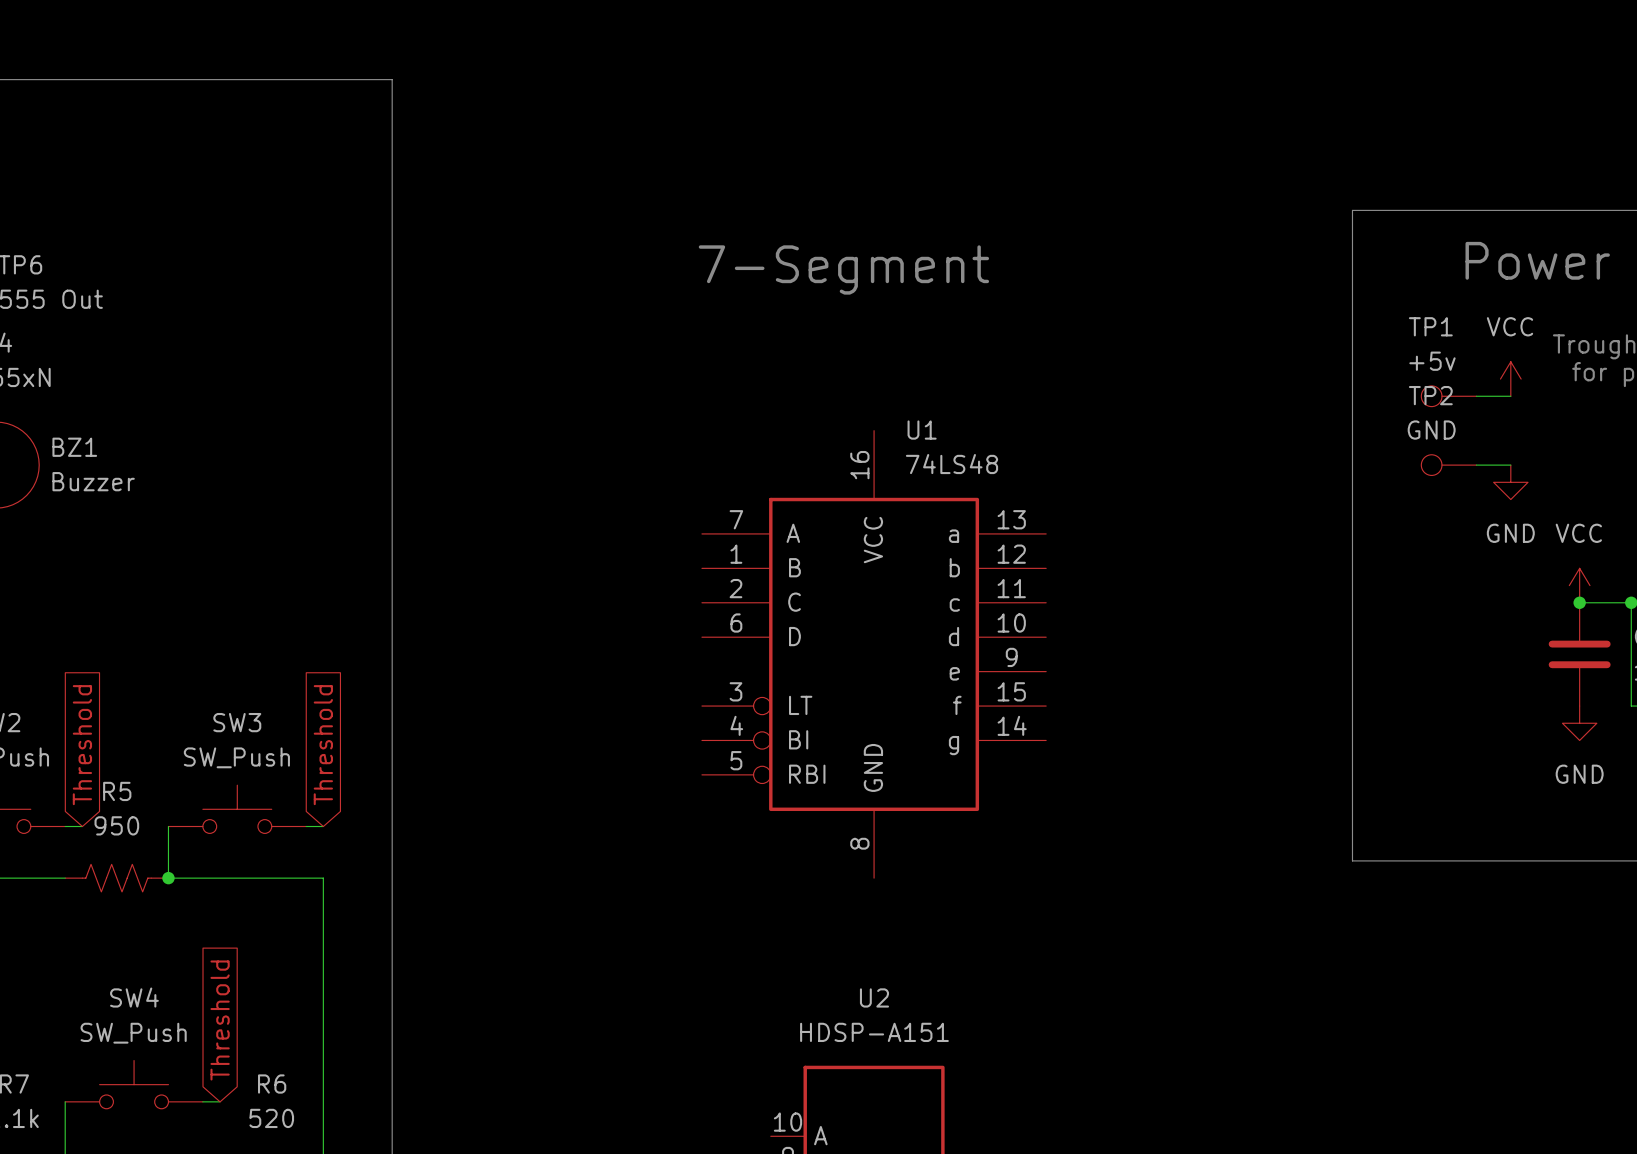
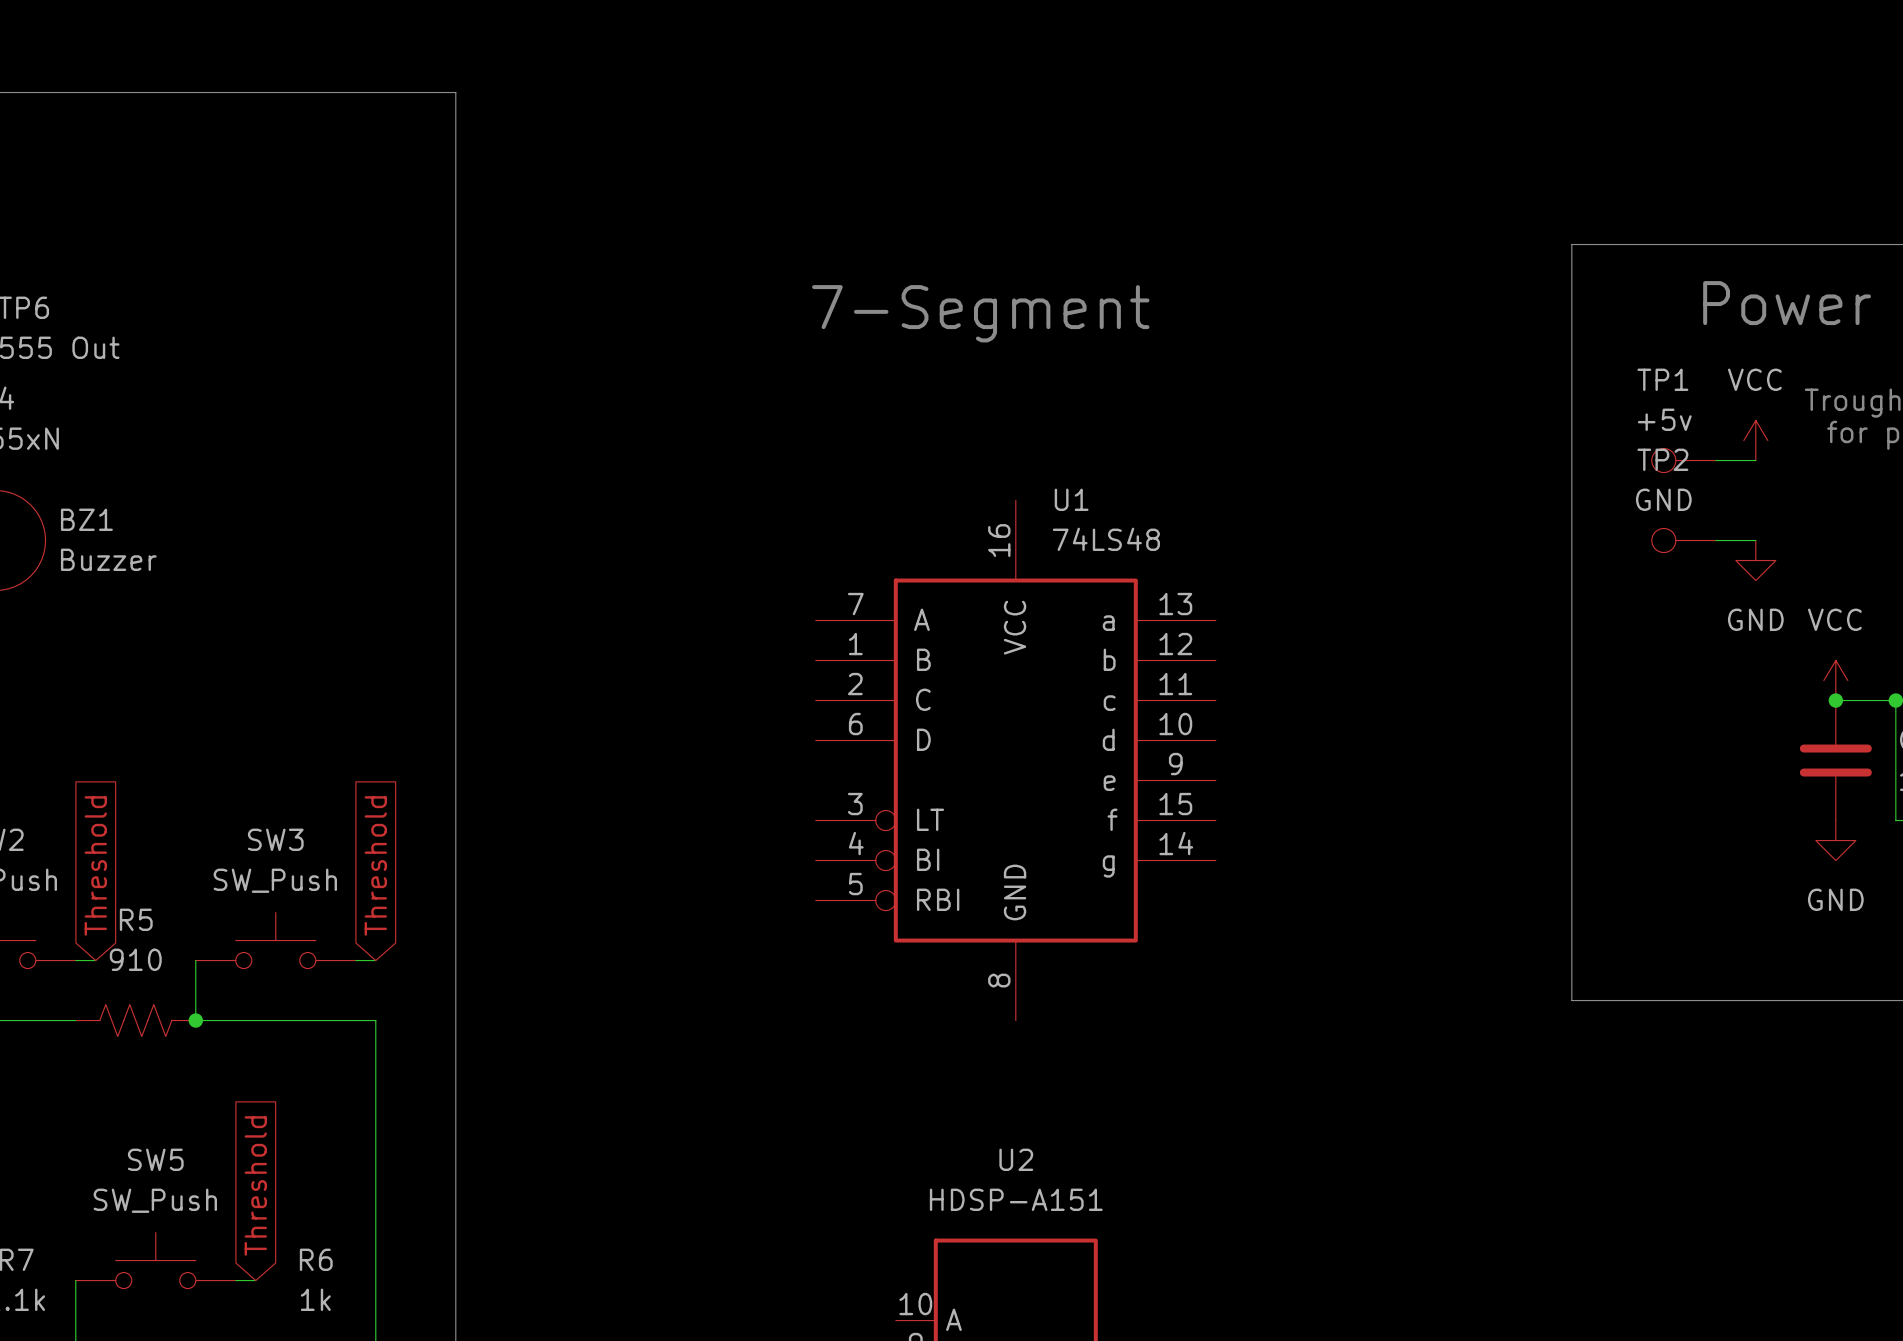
R5 value: 950 (116, 825) -> 910 (135, 959)
SW4 name: SW4 (134, 997) -> SW5 (155, 1159)
R6 value: 520 (271, 1118) -> 1k (315, 1299)

